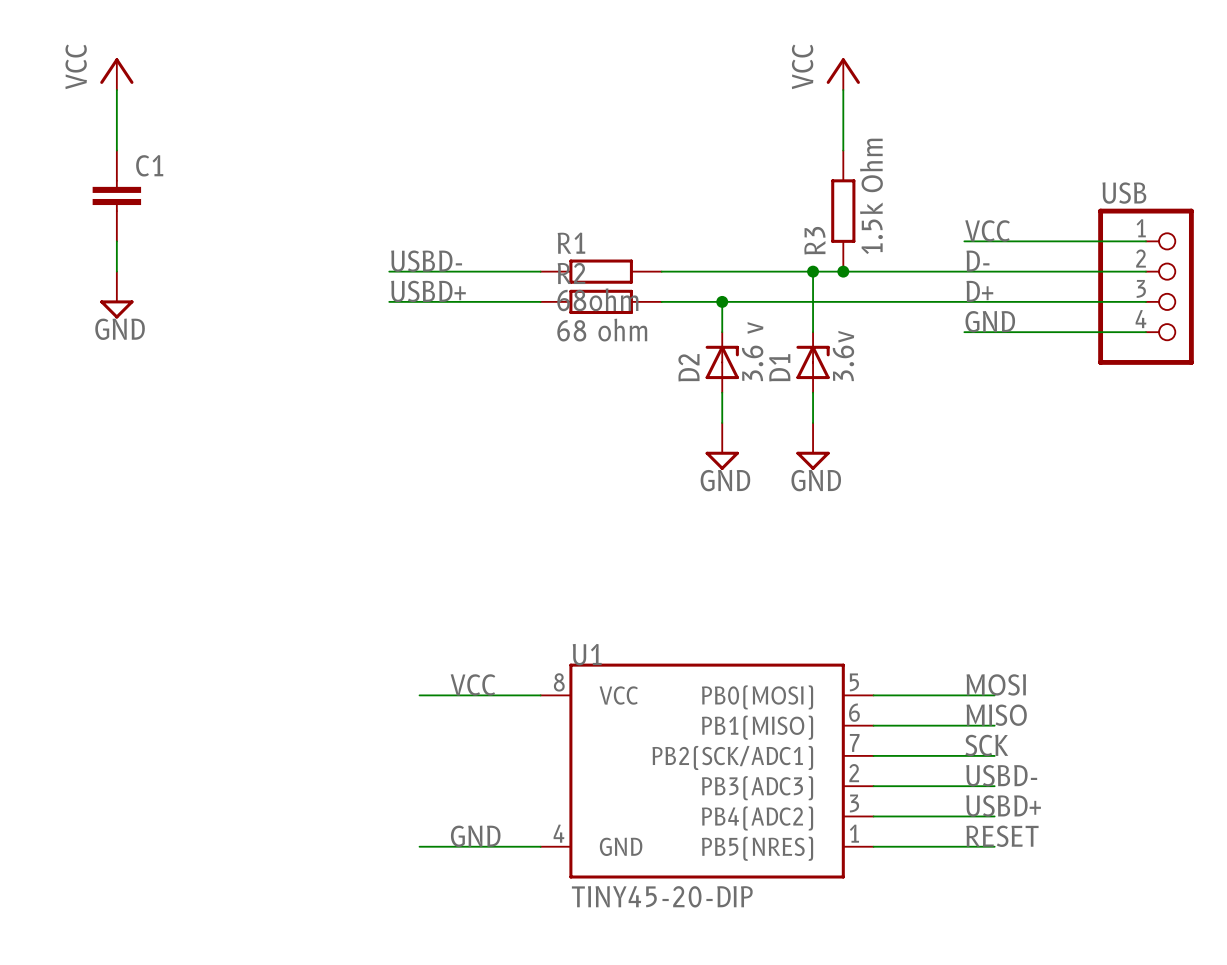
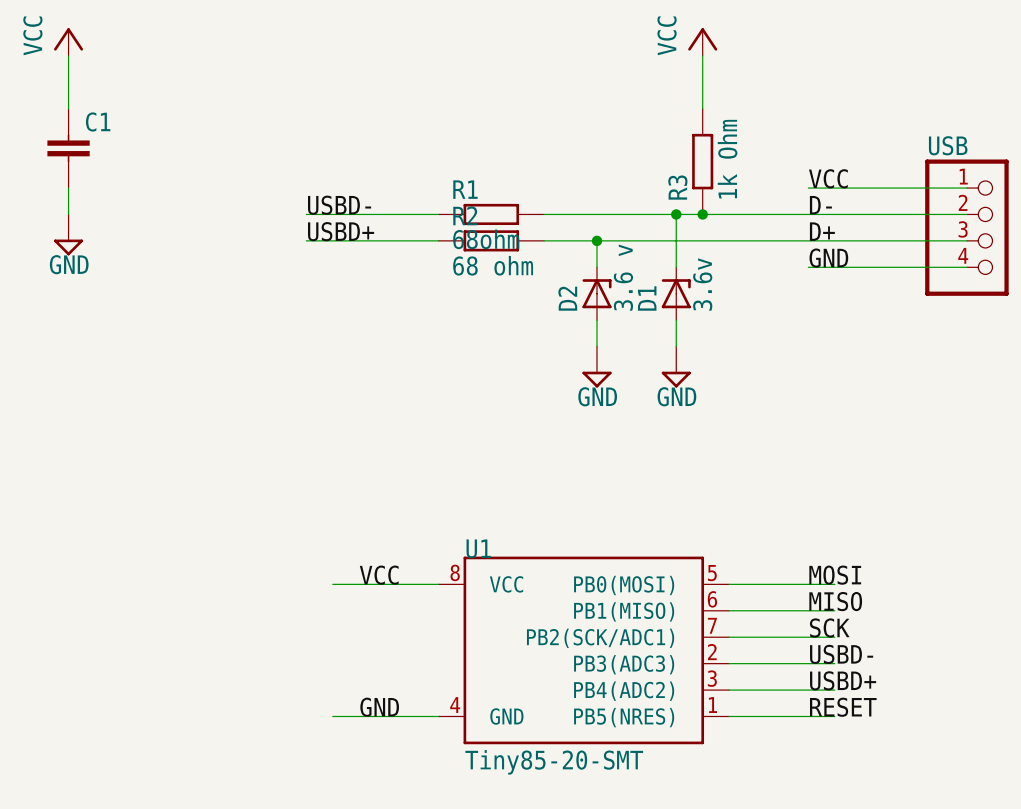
R3 value: 1.5k Ohm (871, 196) -> 1k Ohm (727, 159)
U1 value: TINY45-20-DIP (662, 896) -> Tiny85-20-SMT (554, 762)

